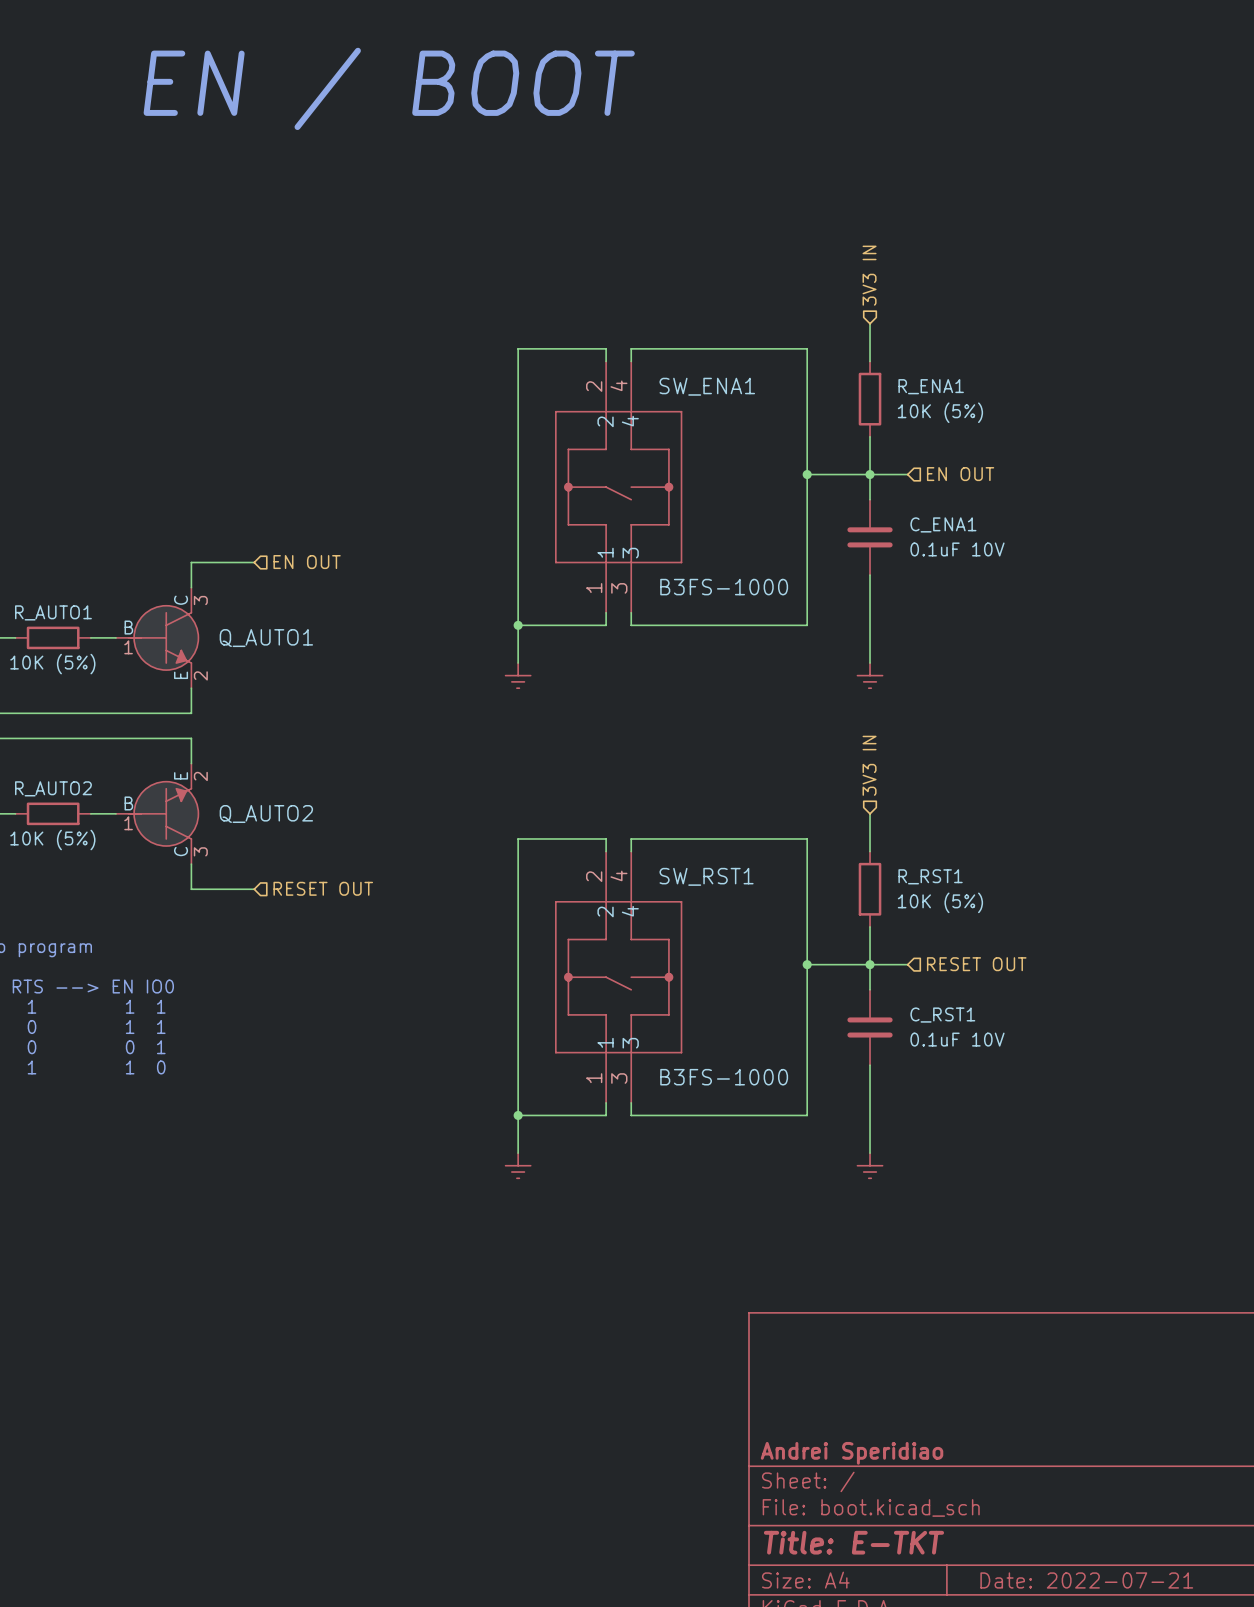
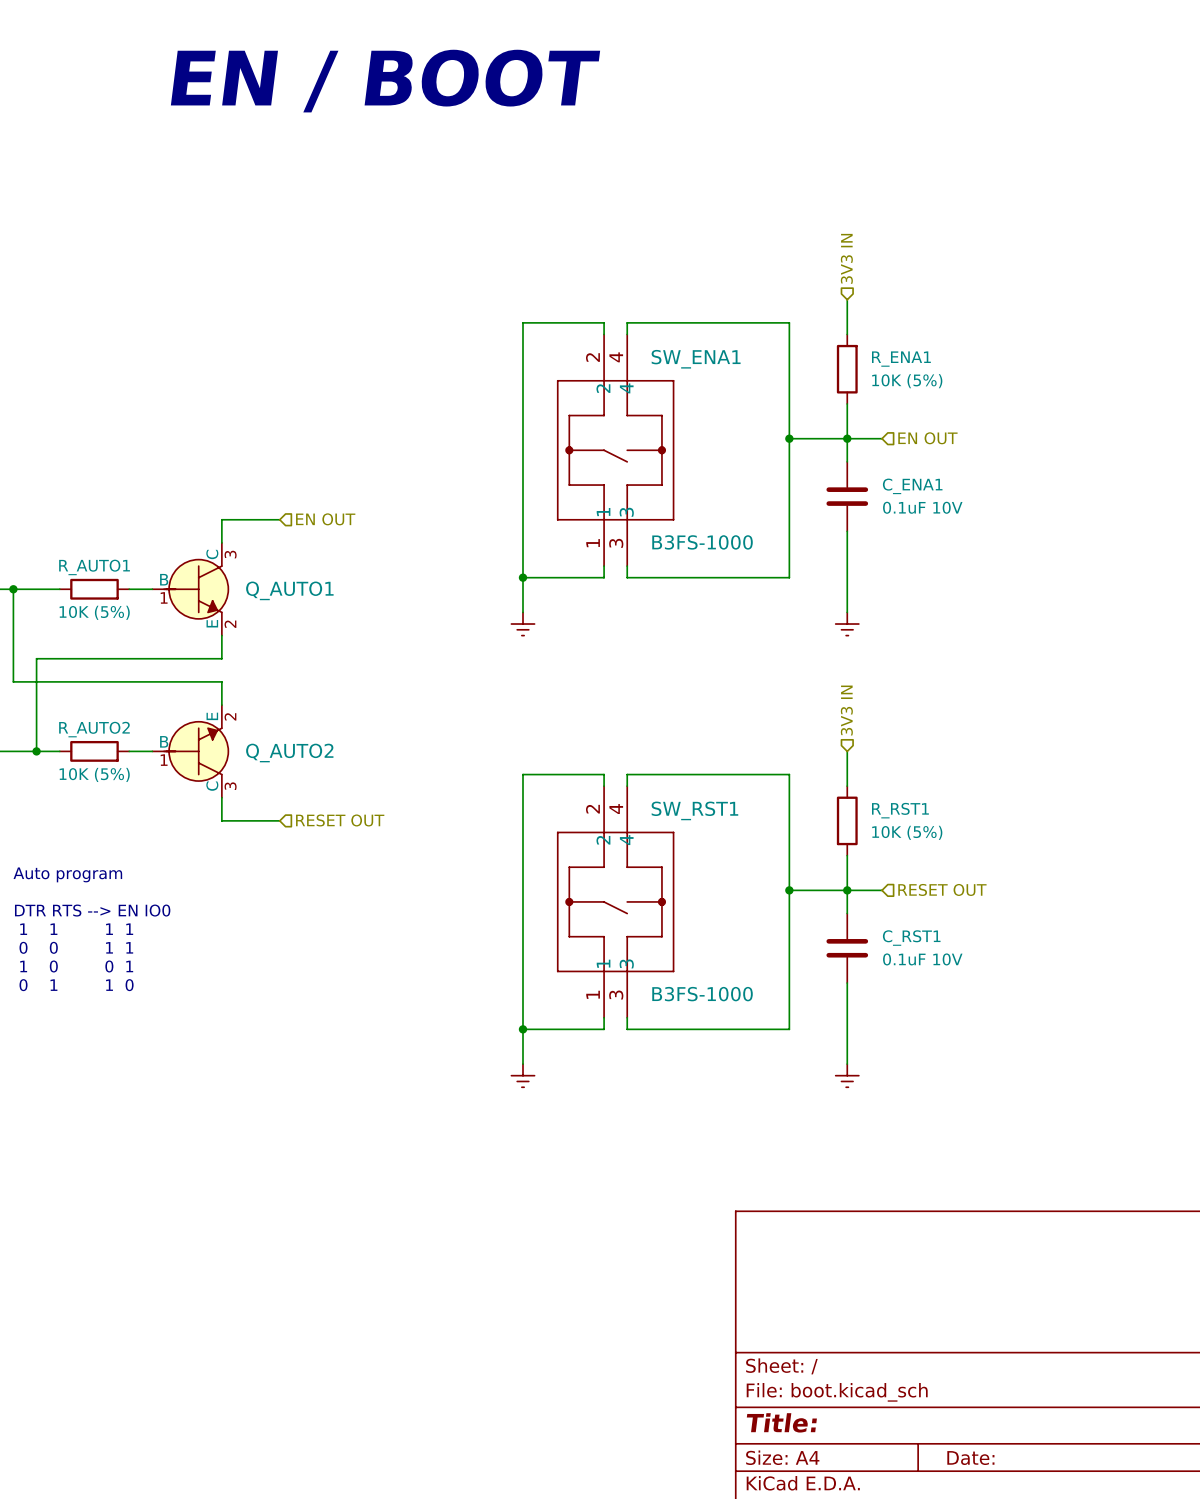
title block: Andrei Speridiao (852, 1453) -> none
title block: Title: E-TKT (853, 1542) -> Title: (781, 1422)
title block: Date: 2022-07-21 (1086, 1580) -> Date: (970, 1458)

